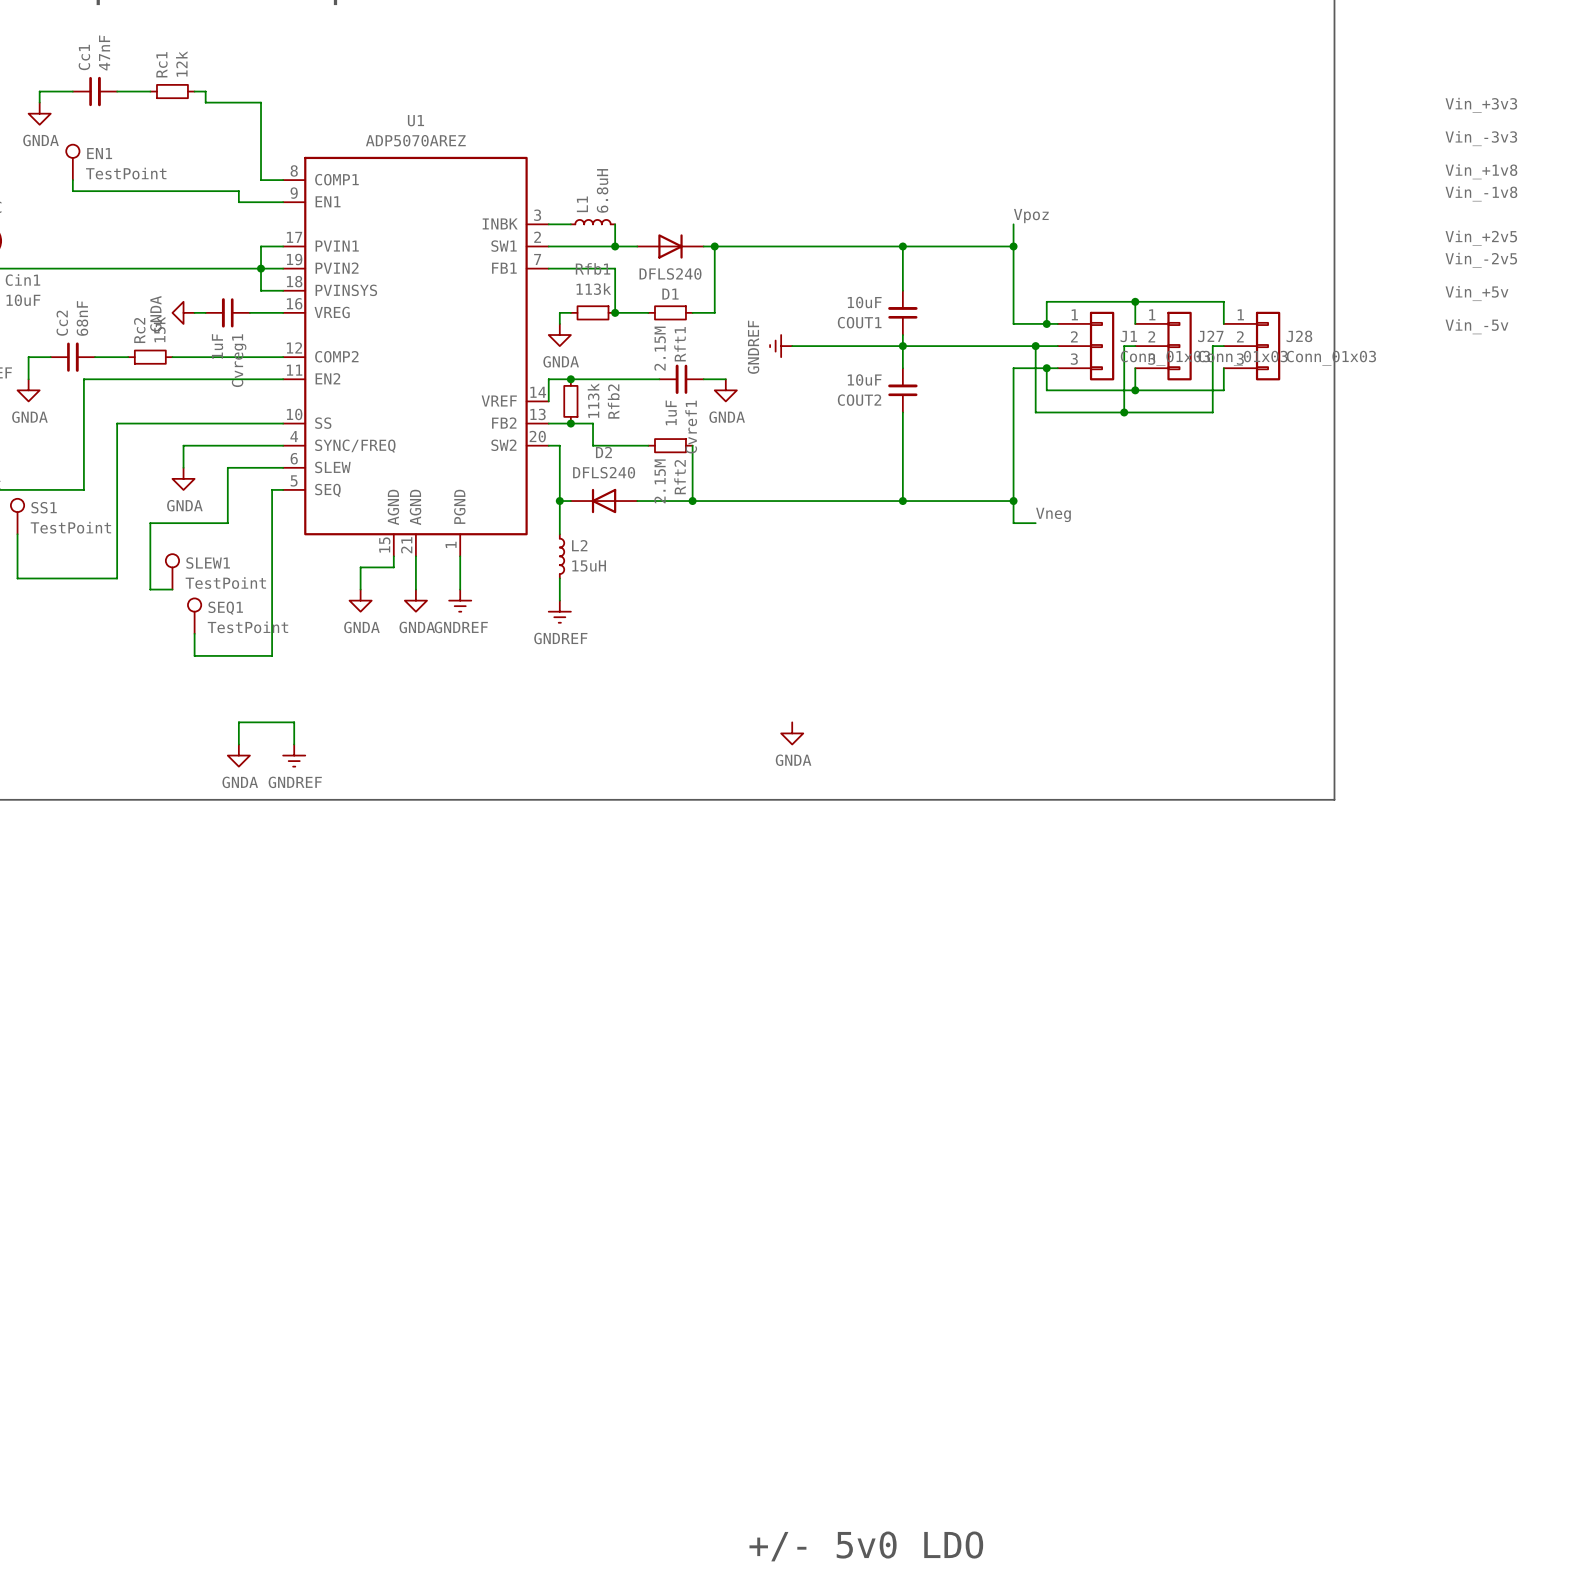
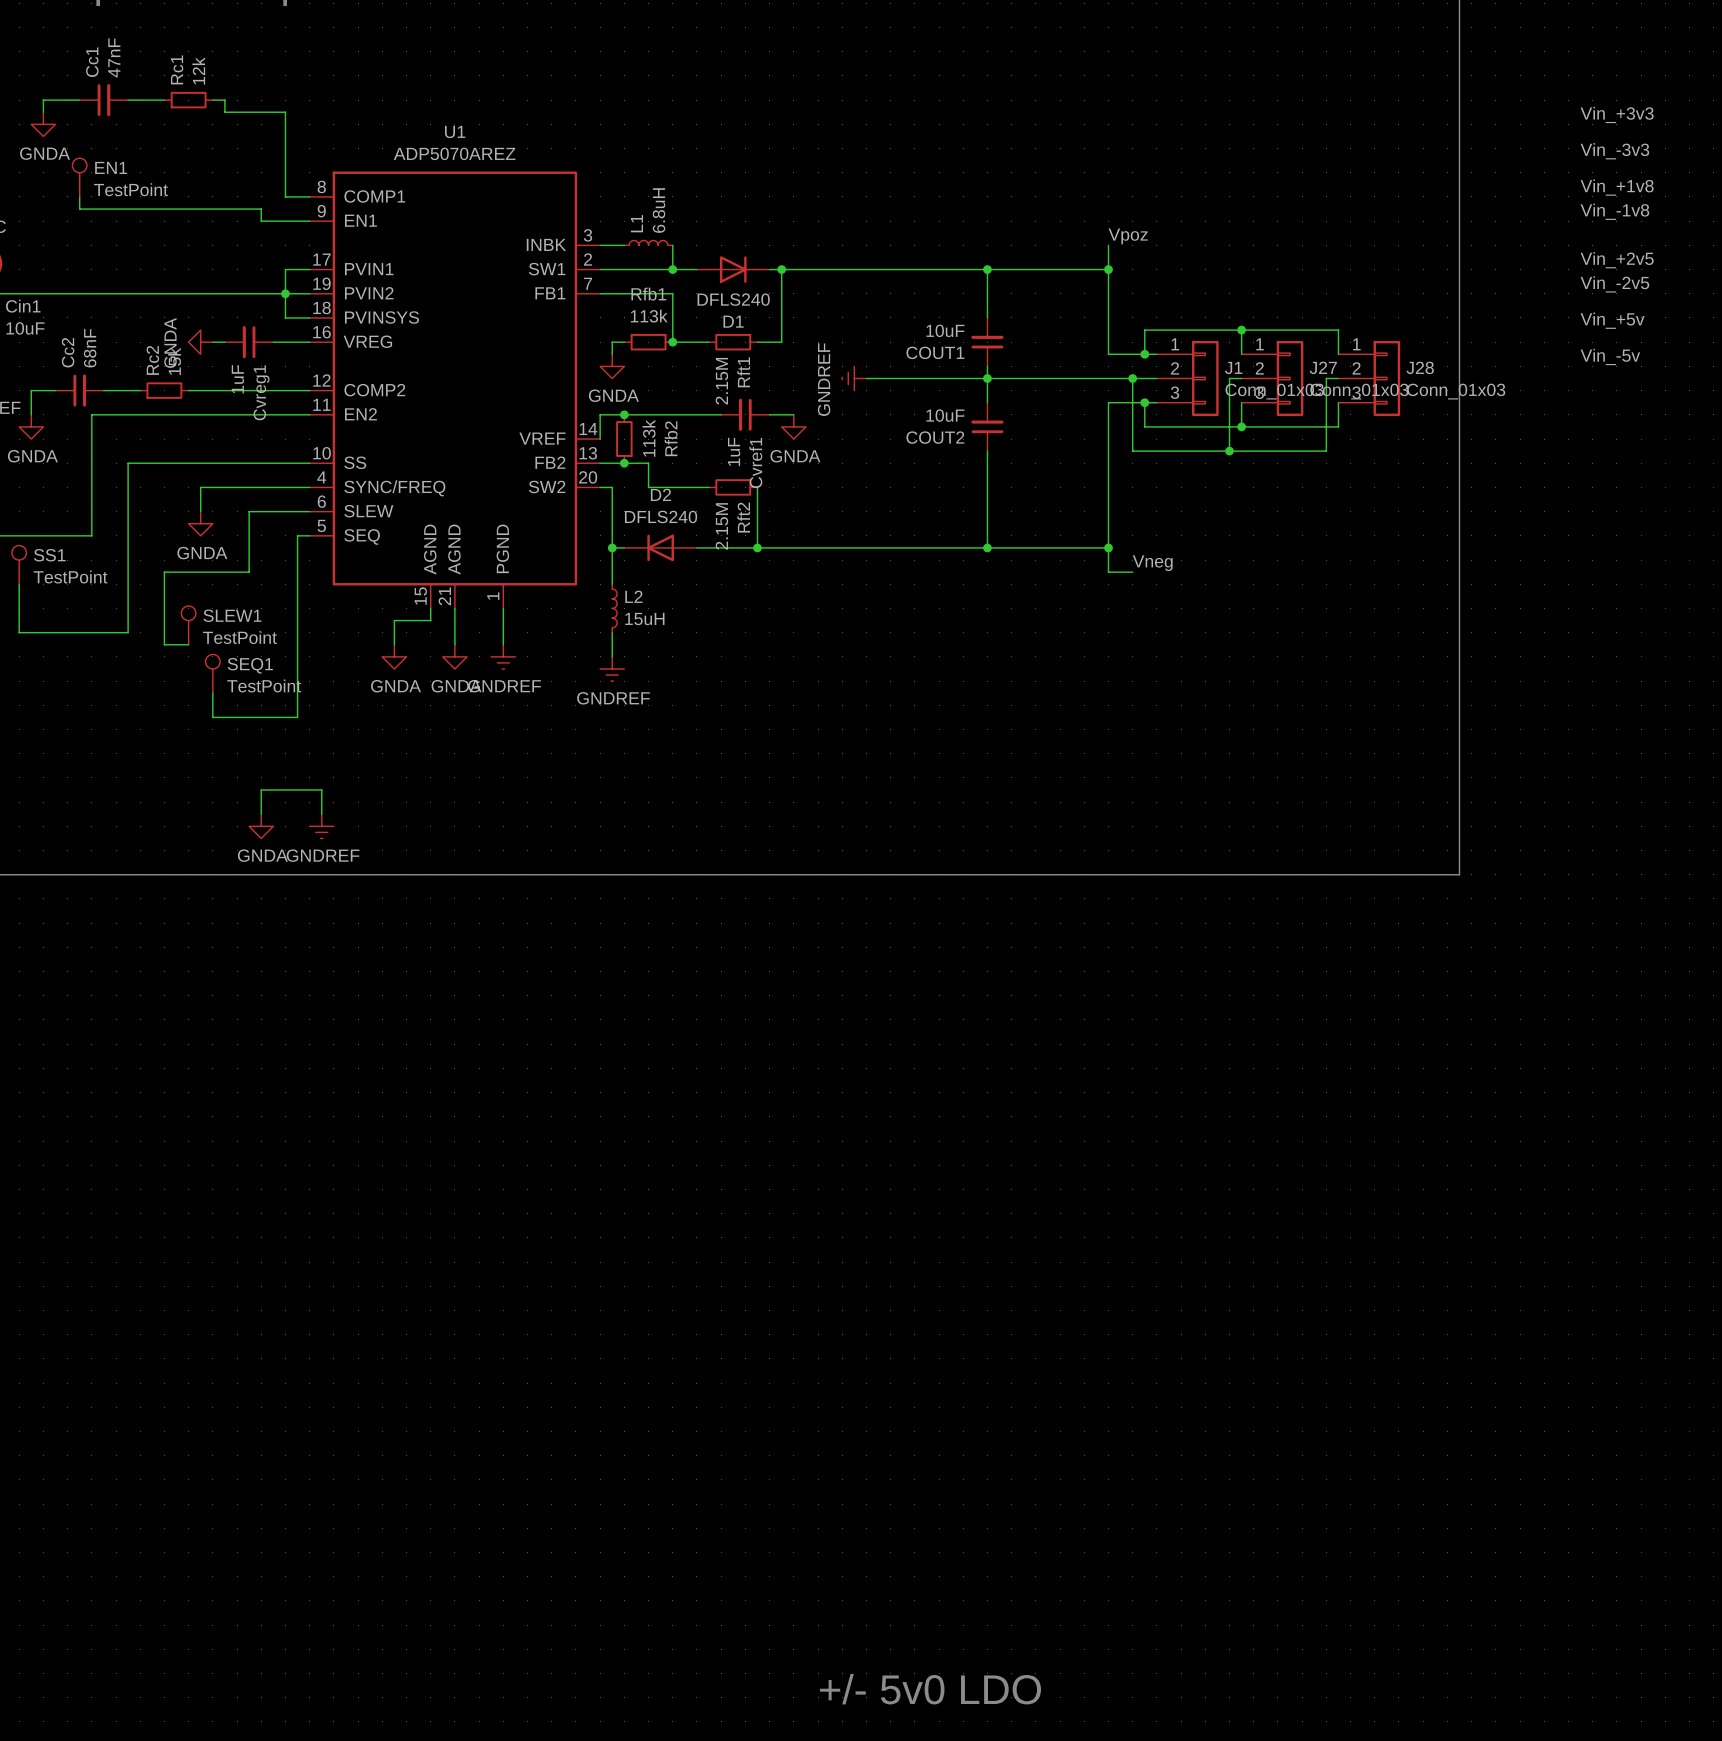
power symbol: GNDA (792, 733) -> none

